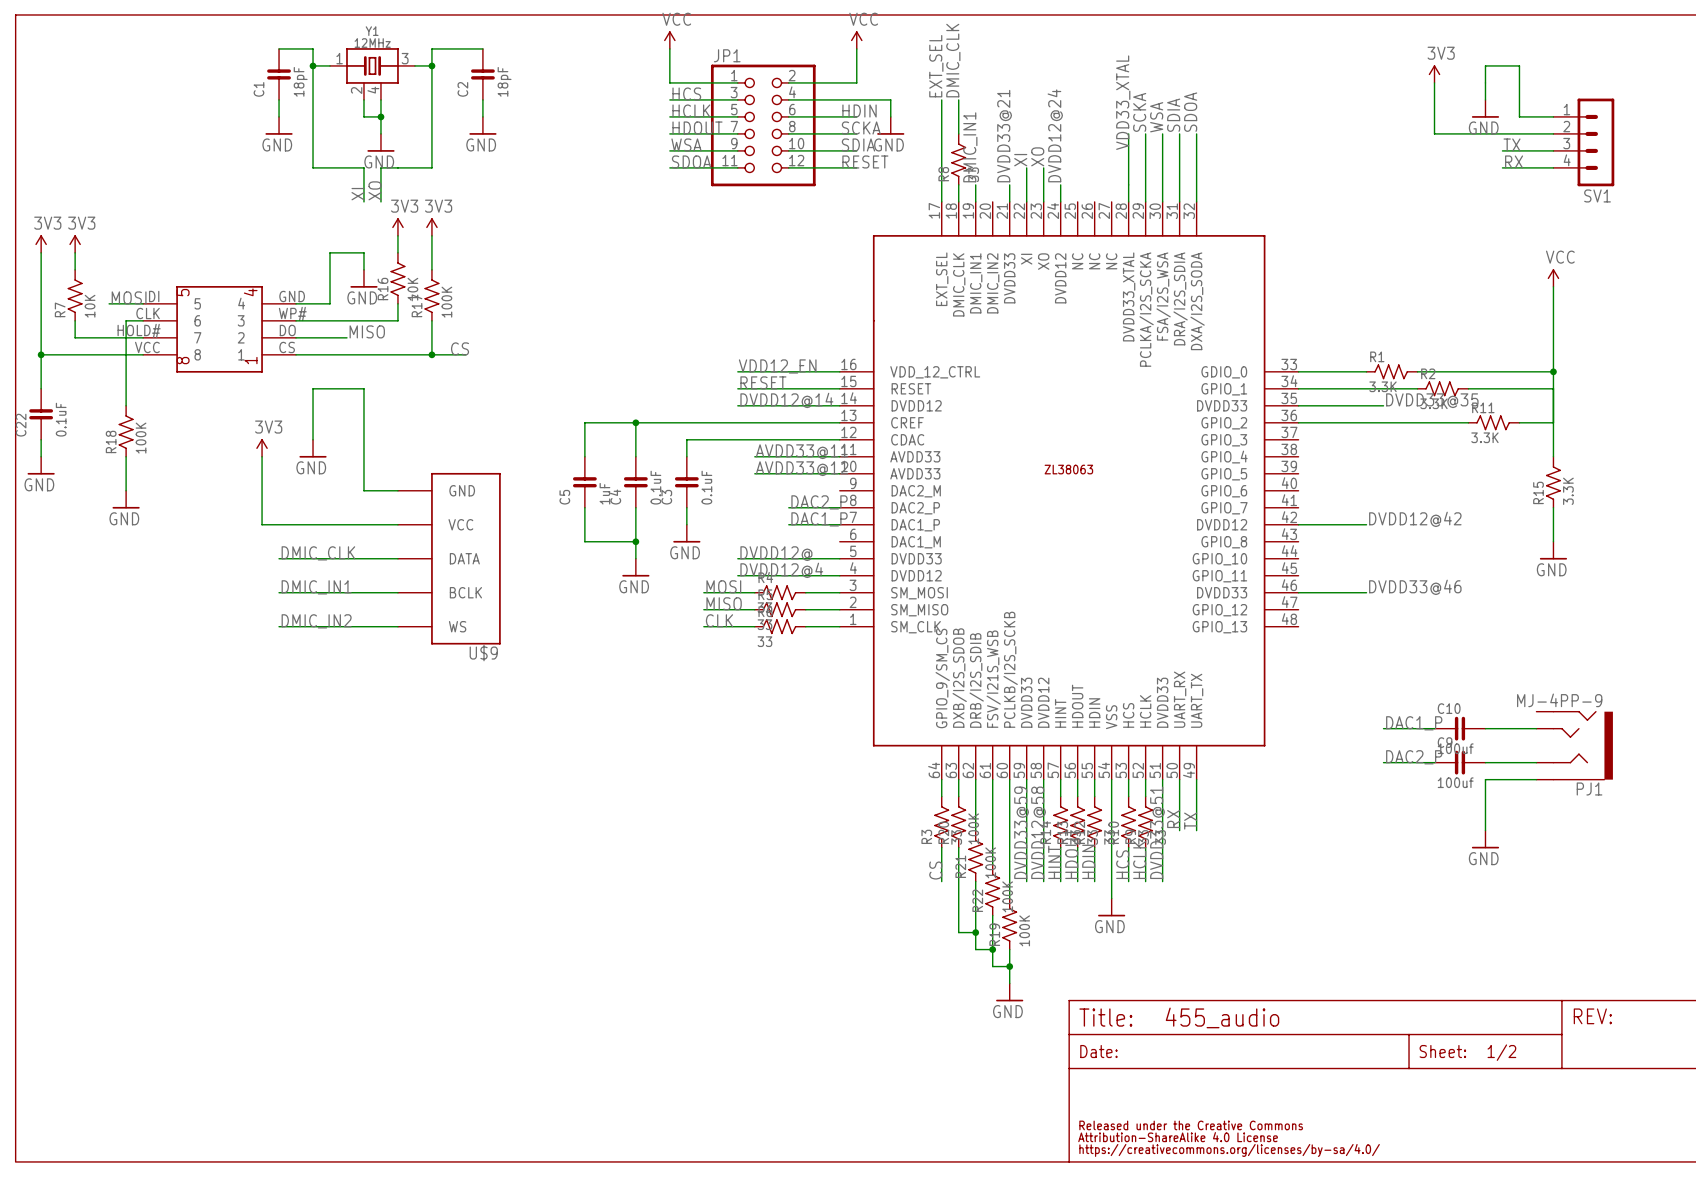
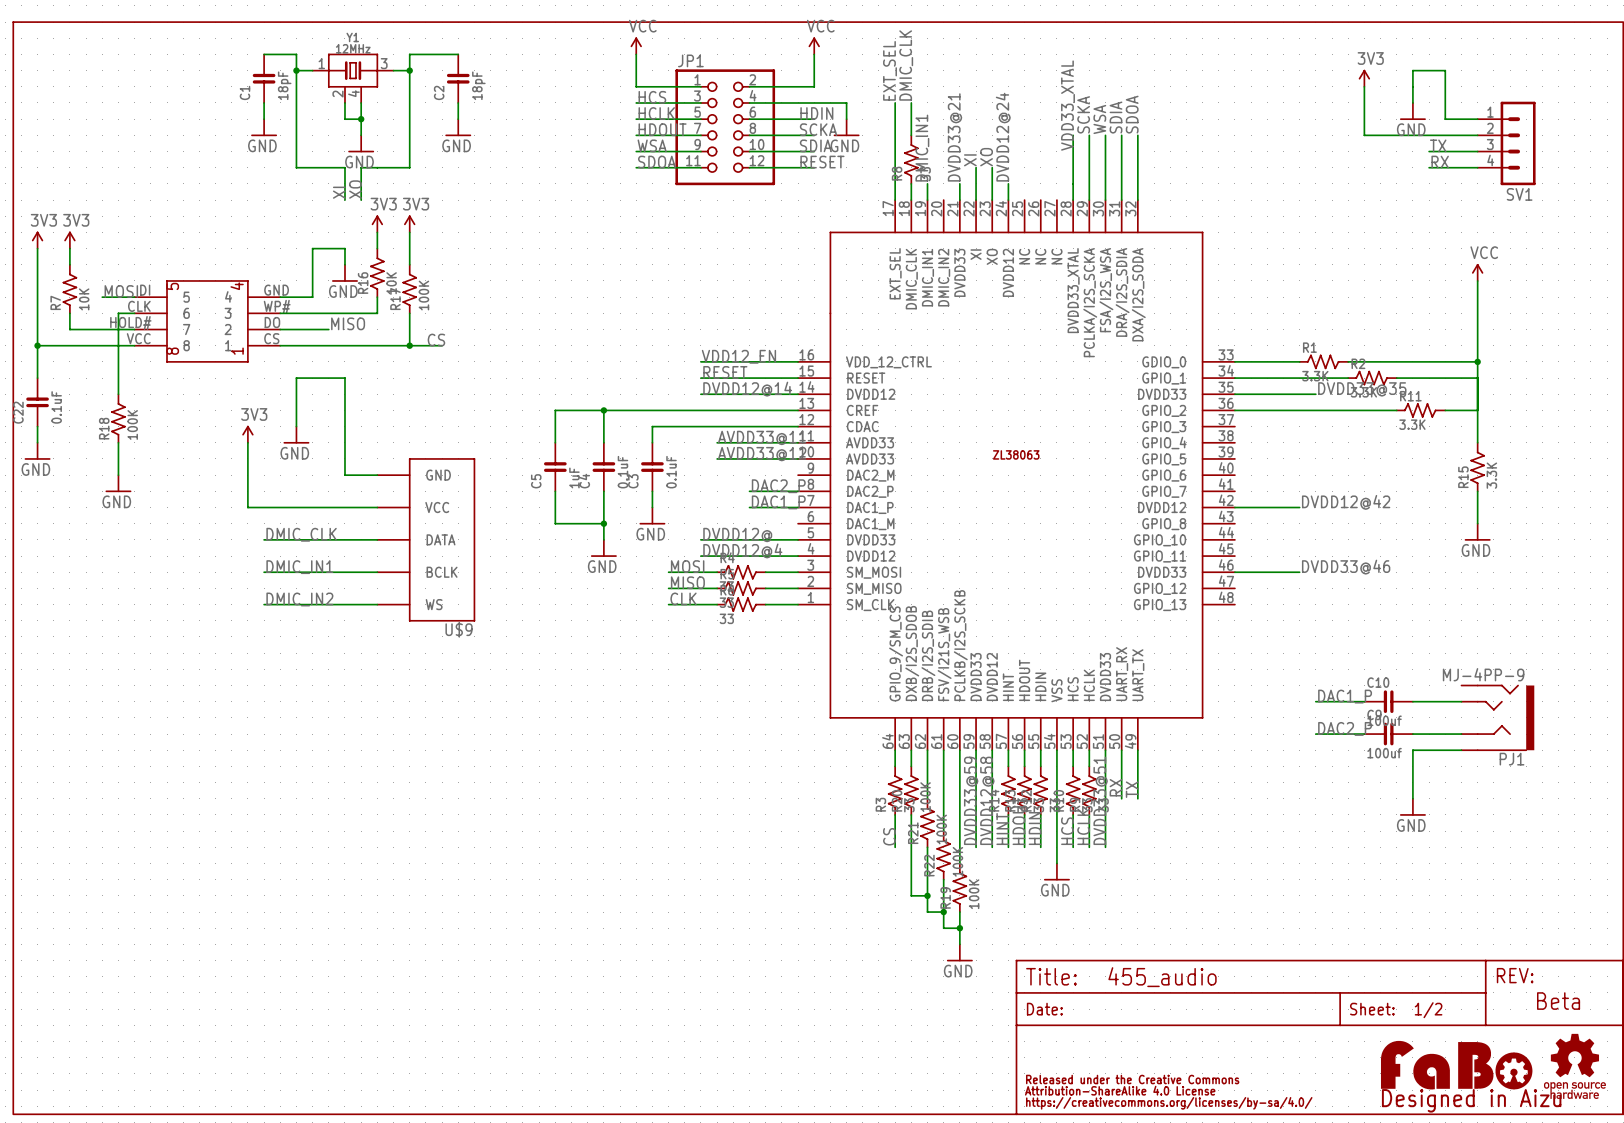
text: none -> Beta (1558, 1001)
part: none -> (1456, 1065)
part: none -> (1574, 1066)

